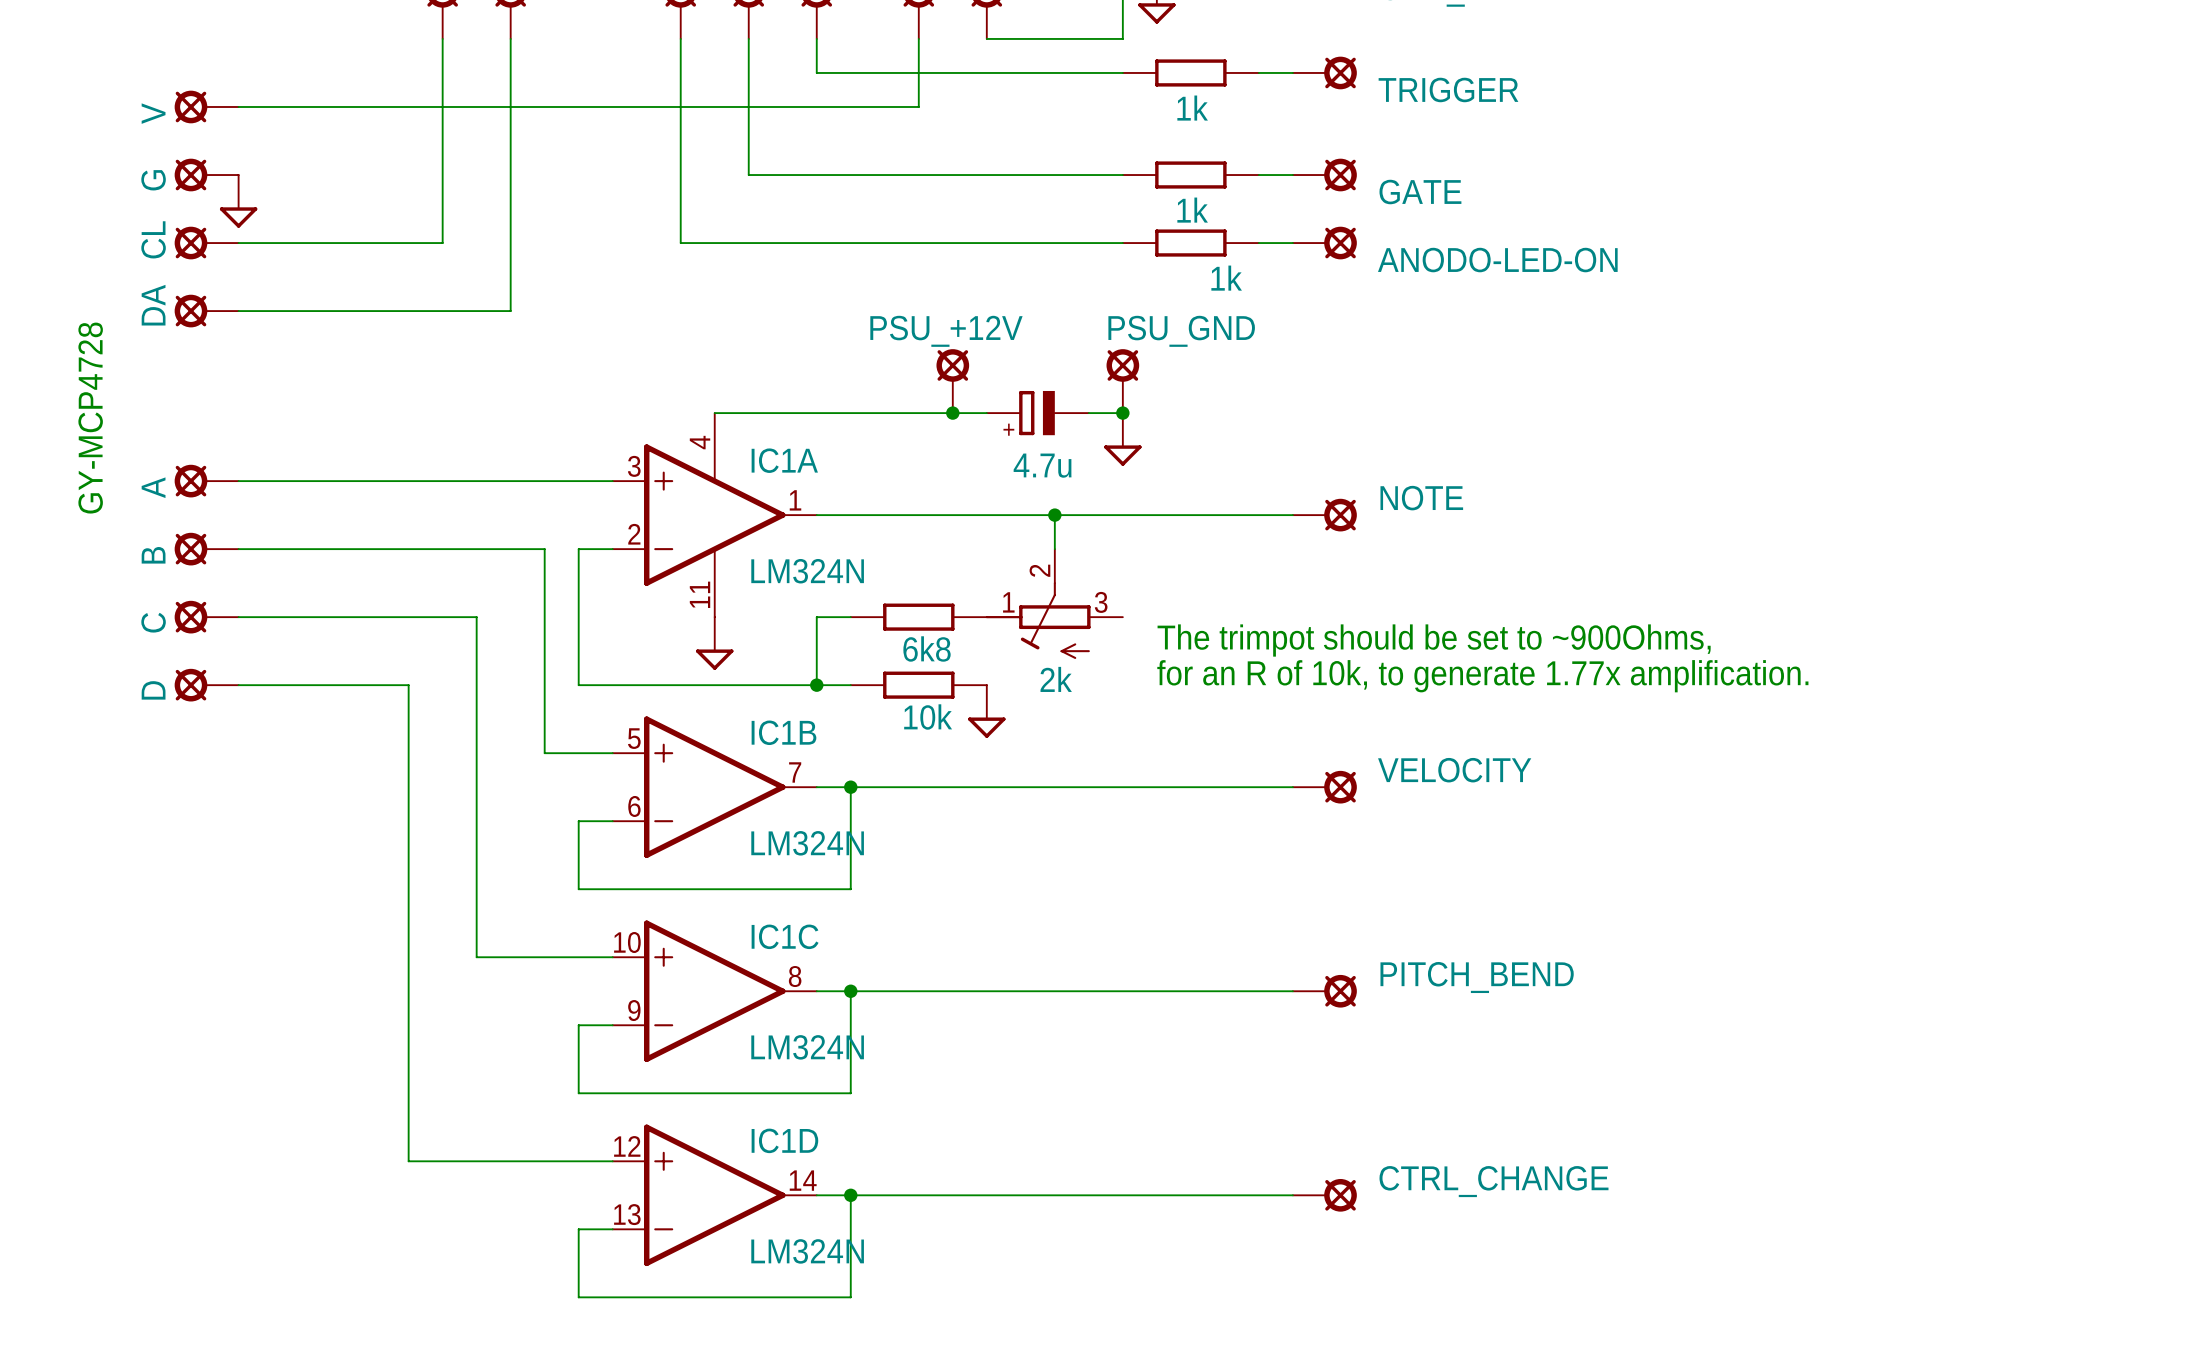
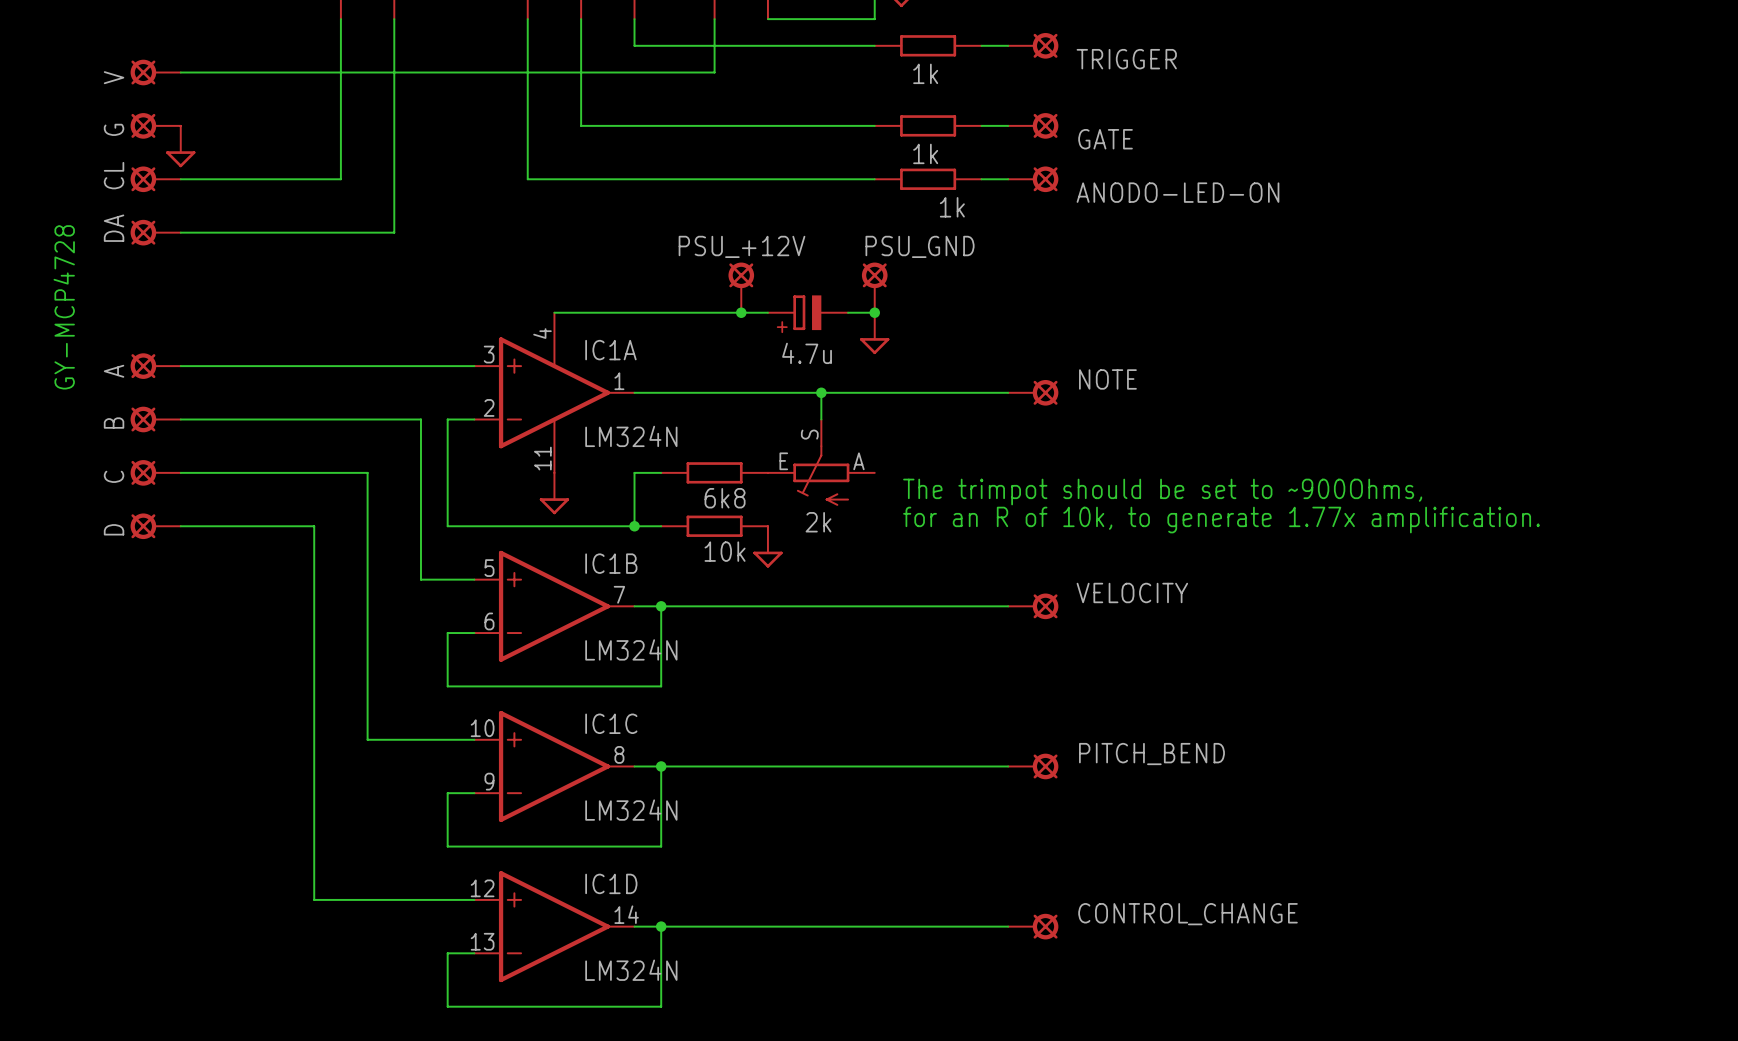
part symbol: [985, 549, 1123, 659] -> [767, 419, 875, 506]
CTRL_CHANGE name: CTRL_CHANGE (1494, 1181) -> CONTROL_CHANGE (1188, 914)

